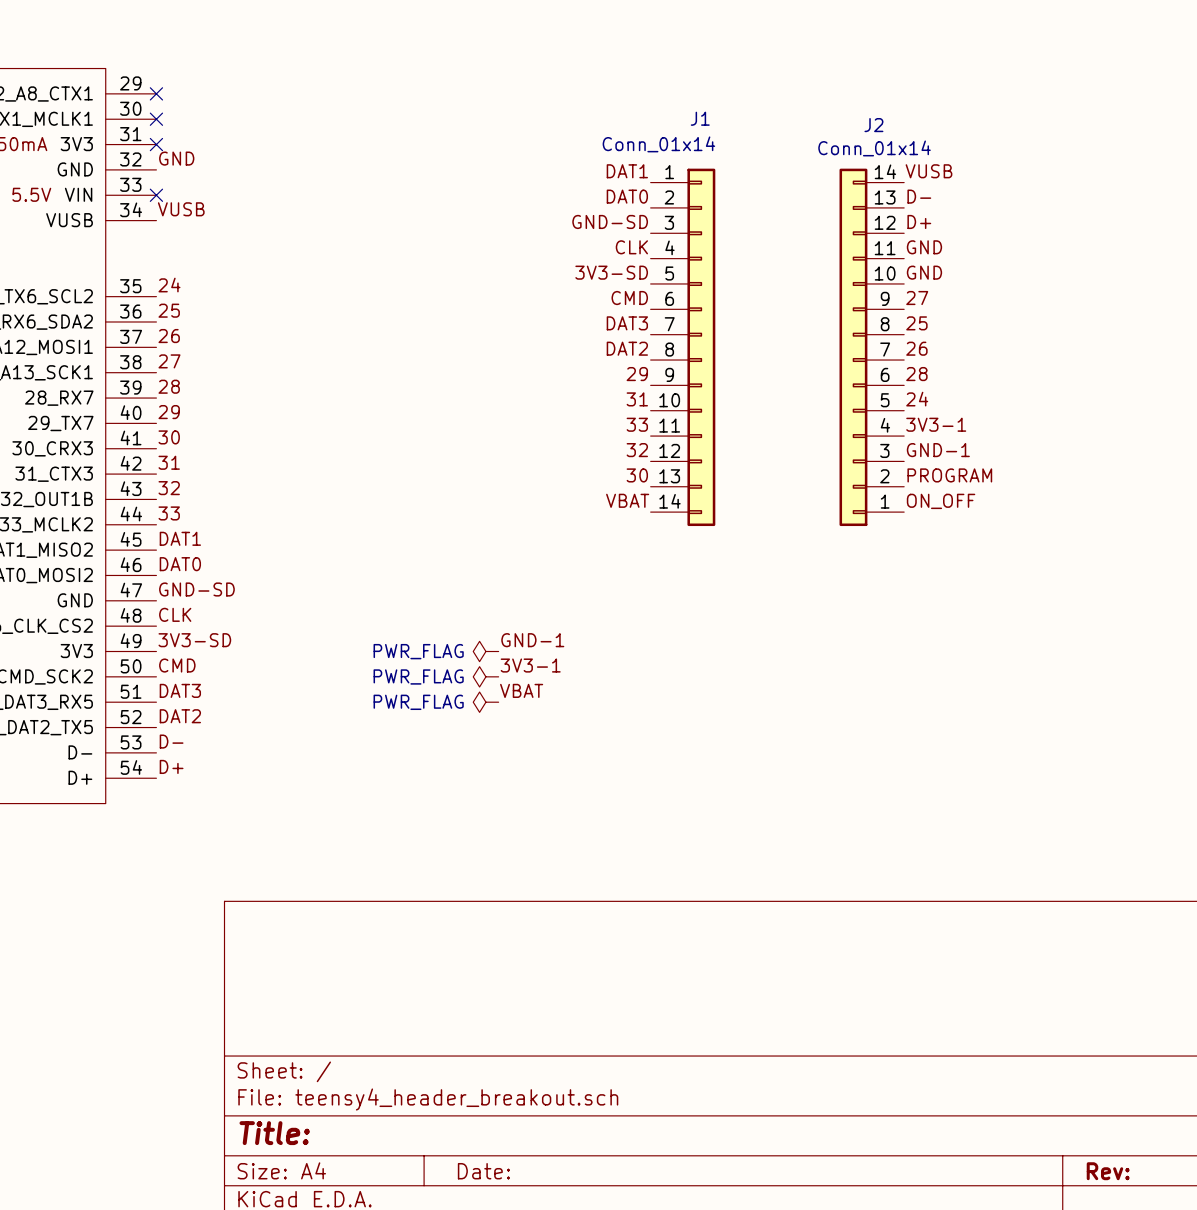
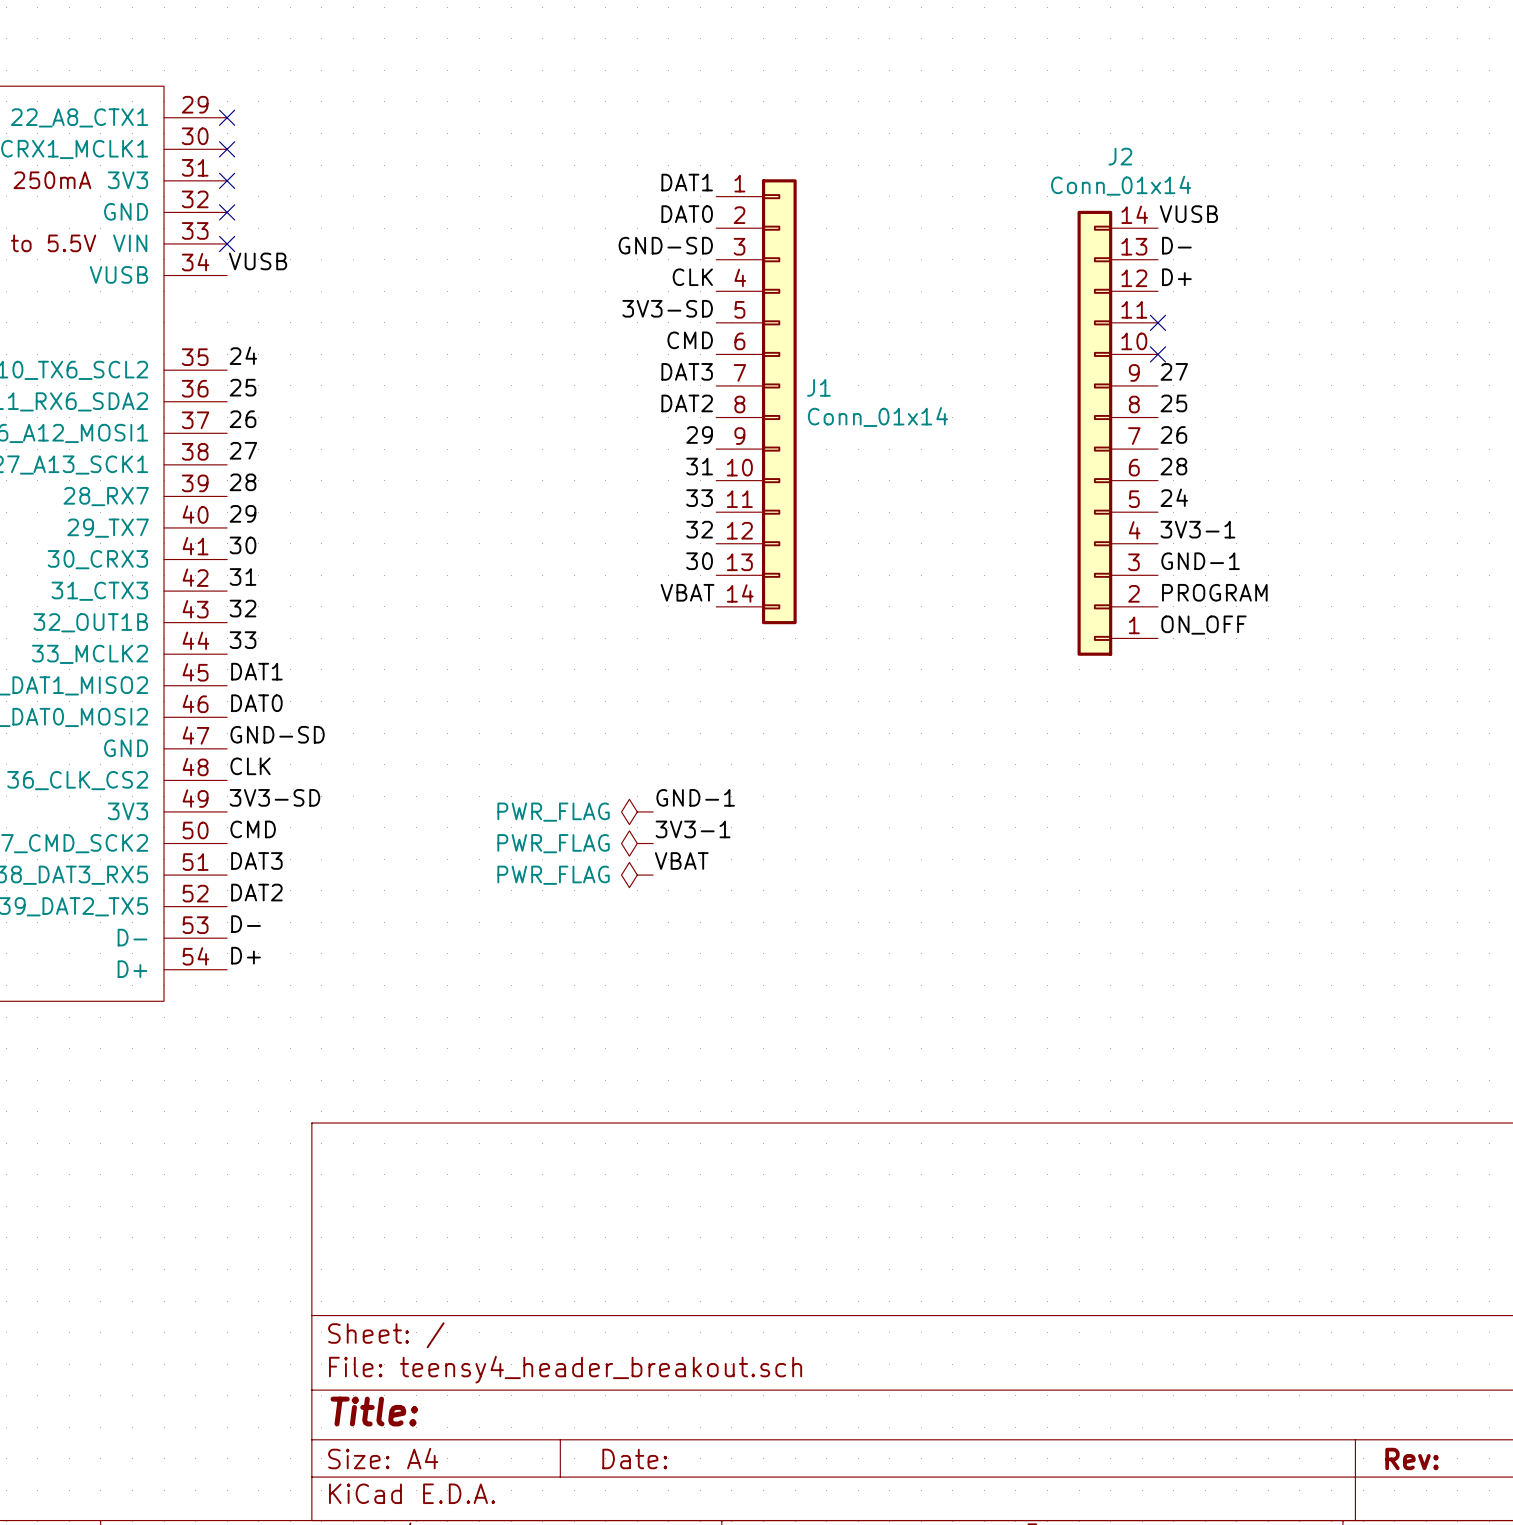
J1 name position: J1 (700, 118) -> J1 (818, 387)
J1 value position: Conn_01x14 (658, 144) -> Conn_01x14 (877, 416)
label: GND (176, 158) -> none
no-connect mark: none -> (227, 212)
label position: DAT1 (627, 171) -> DAT1 (687, 182)
label position: DAT0 (627, 196) -> DAT0 (687, 214)
label position: GND-SD (610, 221) -> GND-SD (665, 245)
label position: CLK (631, 247) -> CLK (692, 277)
label: GND (924, 247) -> none
no-connect mark: none -> (1157, 322)
label position: 3V3-SD (611, 272) -> 3V3-SD (667, 308)
label: GND (924, 272) -> none
no-connect mark: none -> (1157, 354)
label position: CMD (629, 298) -> CMD (690, 340)
label position: DAT3 (627, 323) -> DAT3 (687, 371)
J1 position: (682, 347) -> (756, 401)
label position: DAT2 (627, 348) -> DAT2 (687, 403)
label position: 29 (637, 374) -> 29 (699, 434)
label position: 31 (637, 399) -> 31 (699, 466)
label position: 33 (637, 424) -> 33 (699, 498)
label position: 32 (637, 450) -> 32 (699, 529)
label position: 30 (637, 475) -> 30 (699, 561)
label position: VBAT (627, 500) -> VBAT (687, 592)

